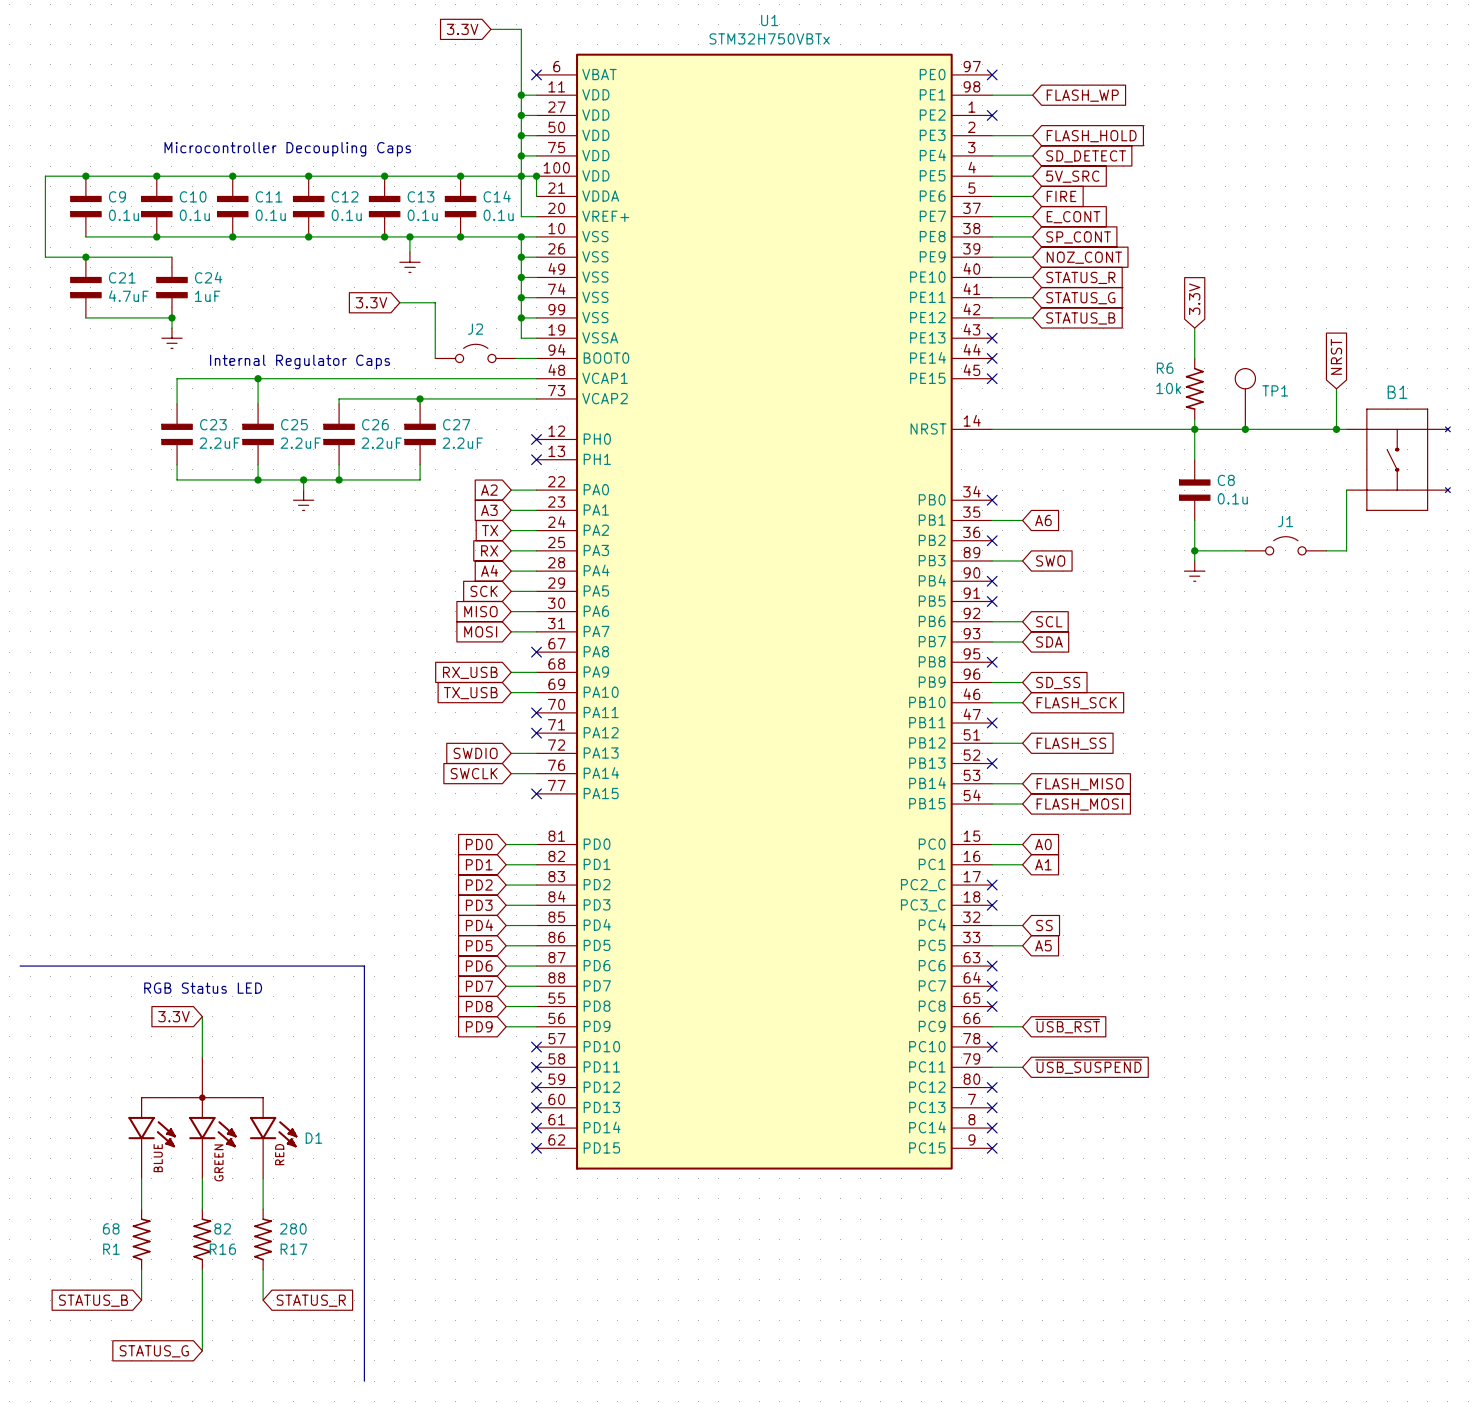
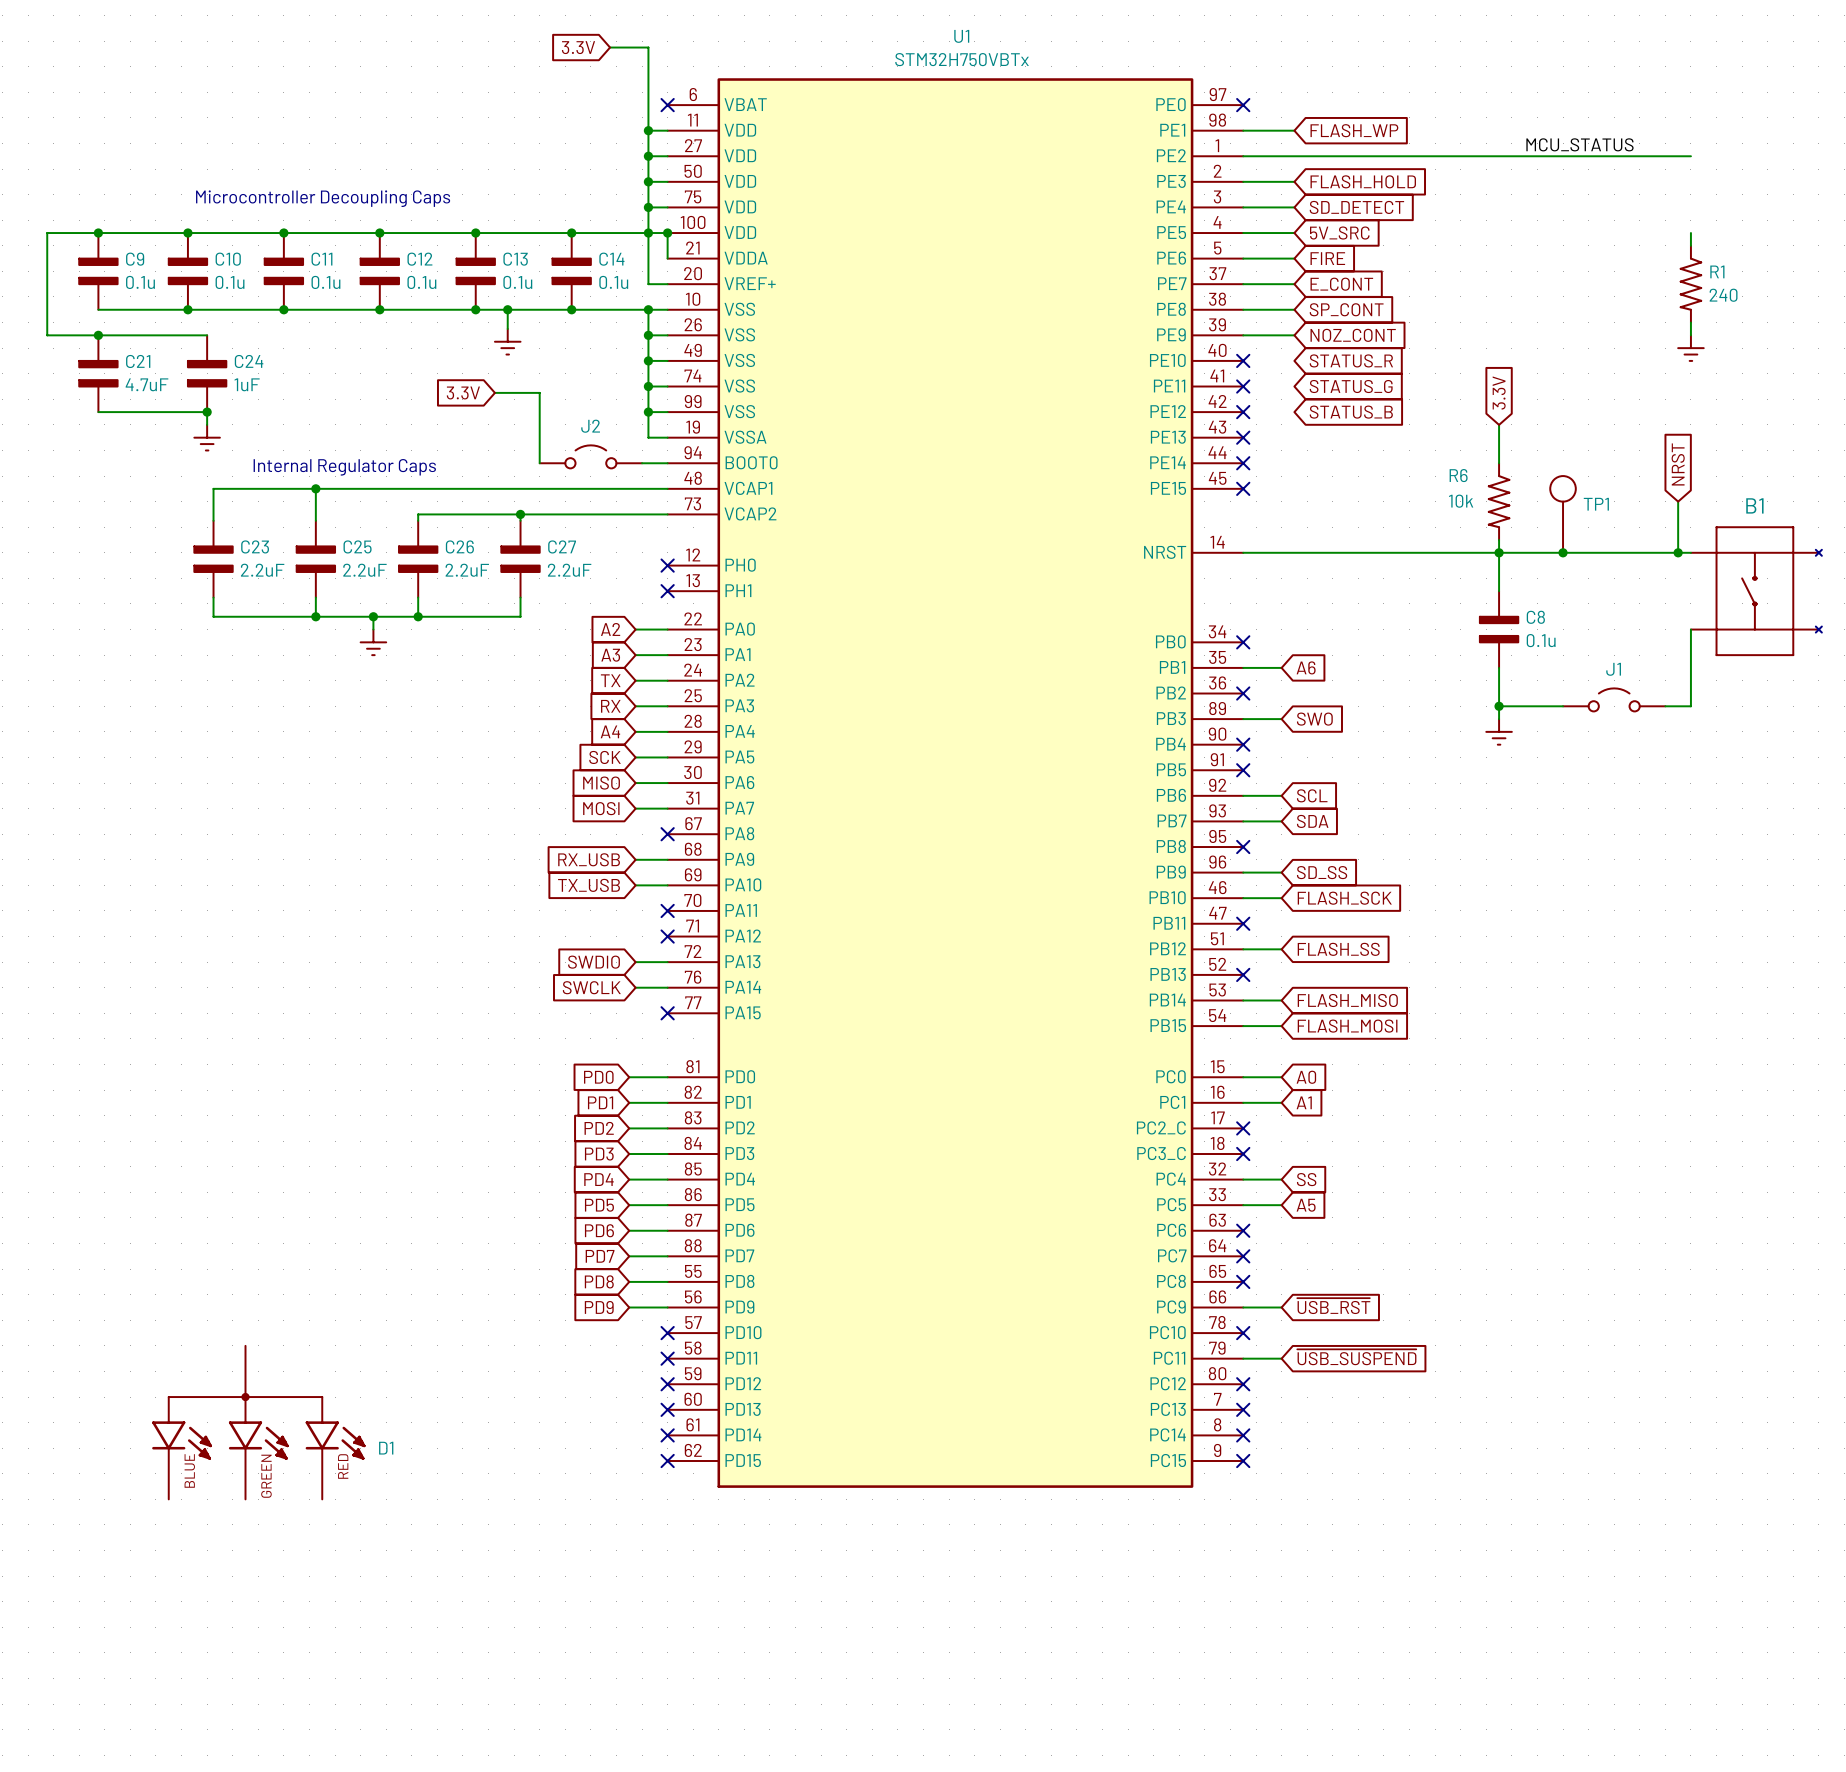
label: none -> MCU_STATUS (1579, 144)
wire: none -> (1243, 156) (1690, 156)
no-connect mark: (992, 115) -> none
wire: none -> (1690, 233) (1690, 245)
wire: none -> (1690, 322) (1690, 335)
power symbol: none -> (1690, 348)
wire: (992, 277) (1032, 277) -> none
no-connect mark: none -> (1243, 360)
wire: (992, 297) (1032, 297) -> none
no-connect mark: none -> (1243, 386)
wire: (992, 317) (1032, 317) -> none
no-connect mark: none -> (1243, 412)
line: (20, 966) (364, 966) (364, 1381) -> none
text: RGB Status LED (203, 988) -> none
global label: 3.3V (174, 1016) -> none
wire: (202, 1016) (202, 1057) -> none
wire: (141, 1178) (141, 1209) -> none
wire: (202, 1178) (202, 1209) -> none
wire: (263, 1178) (263, 1209) -> none
R1 value: 68 (111, 1228) -> 240 (1723, 295)
R1 rotation: 0° (141, 1239) -> 180° (1690, 284)
R1 position: (141, 1239) -> (1690, 284)
R16: 82 (202, 1239) -> none
R17: 280 (263, 1239) -> none
wire: (141, 1269) (141, 1300) -> none
wire: (202, 1269) (202, 1350) -> none
wire: (263, 1269) (263, 1300) -> none
global label: STATUS_B (93, 1300) -> none
global label: STATUS_R (311, 1300) -> none
global label: STATUS_G (154, 1351) -> none

